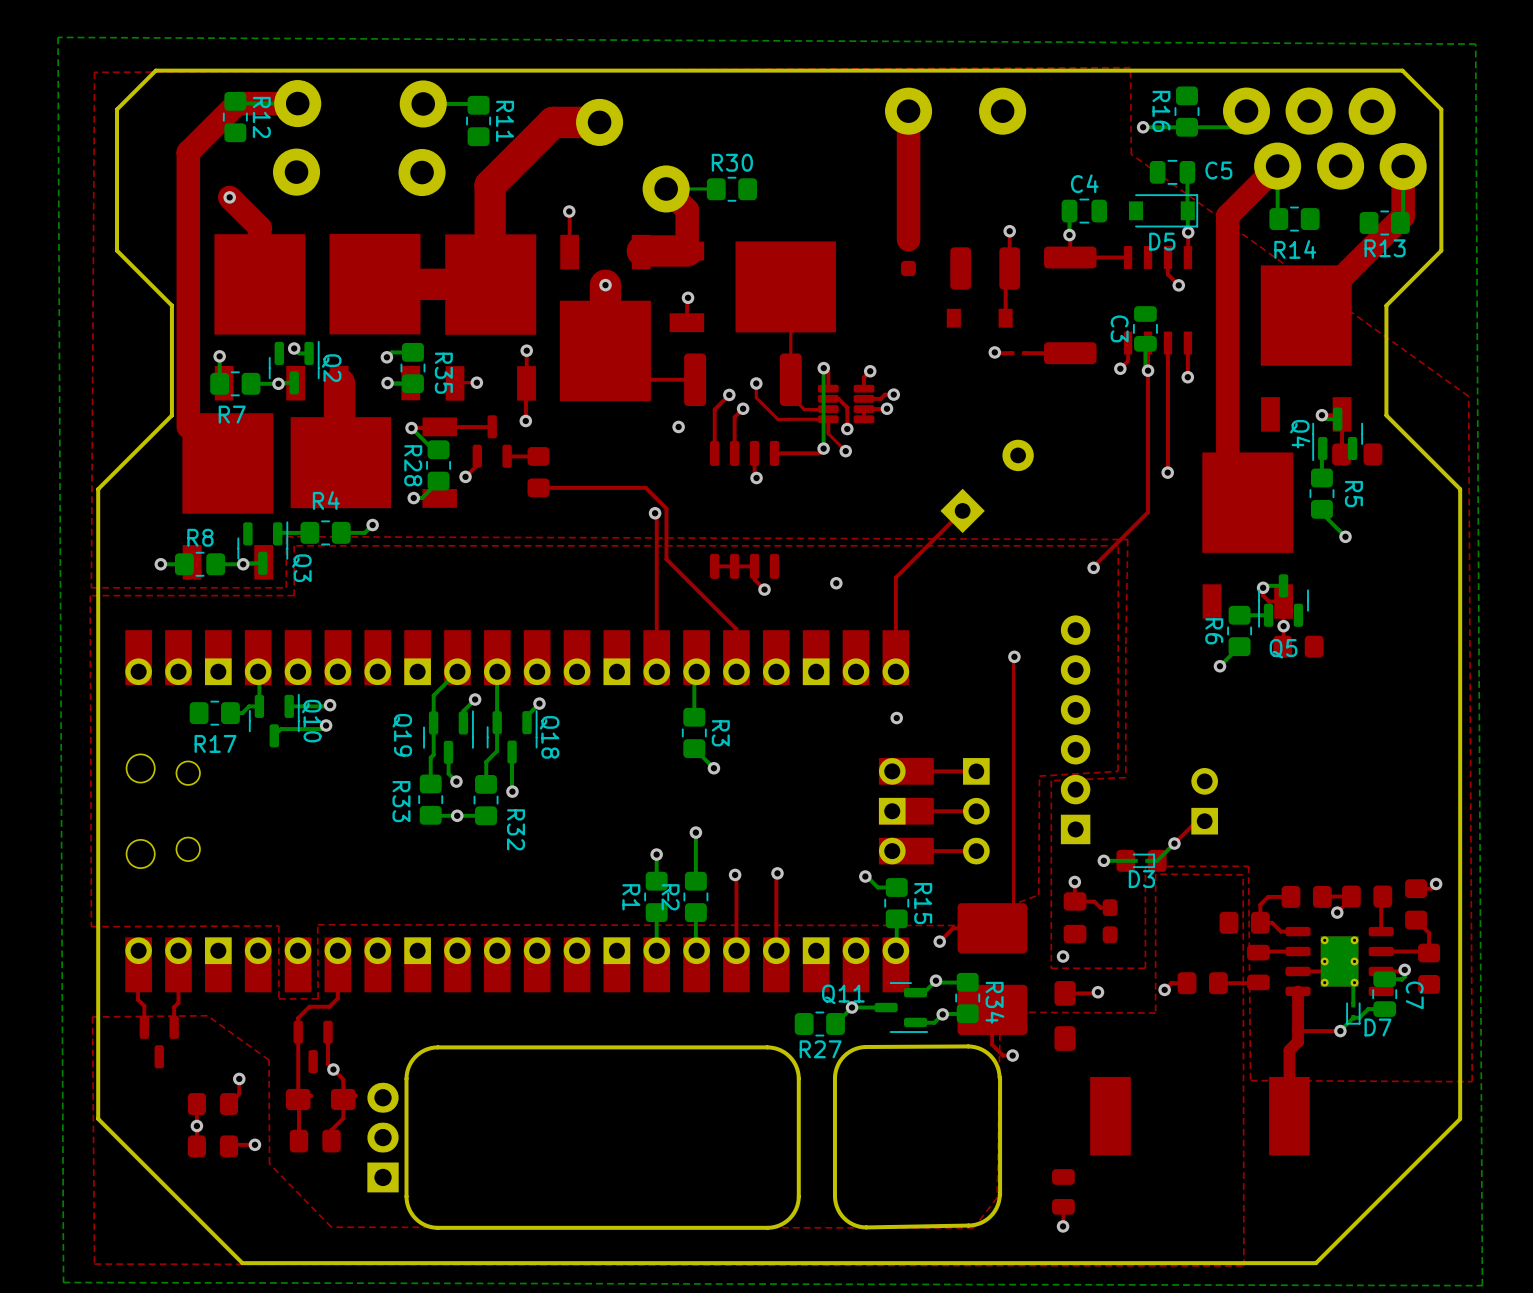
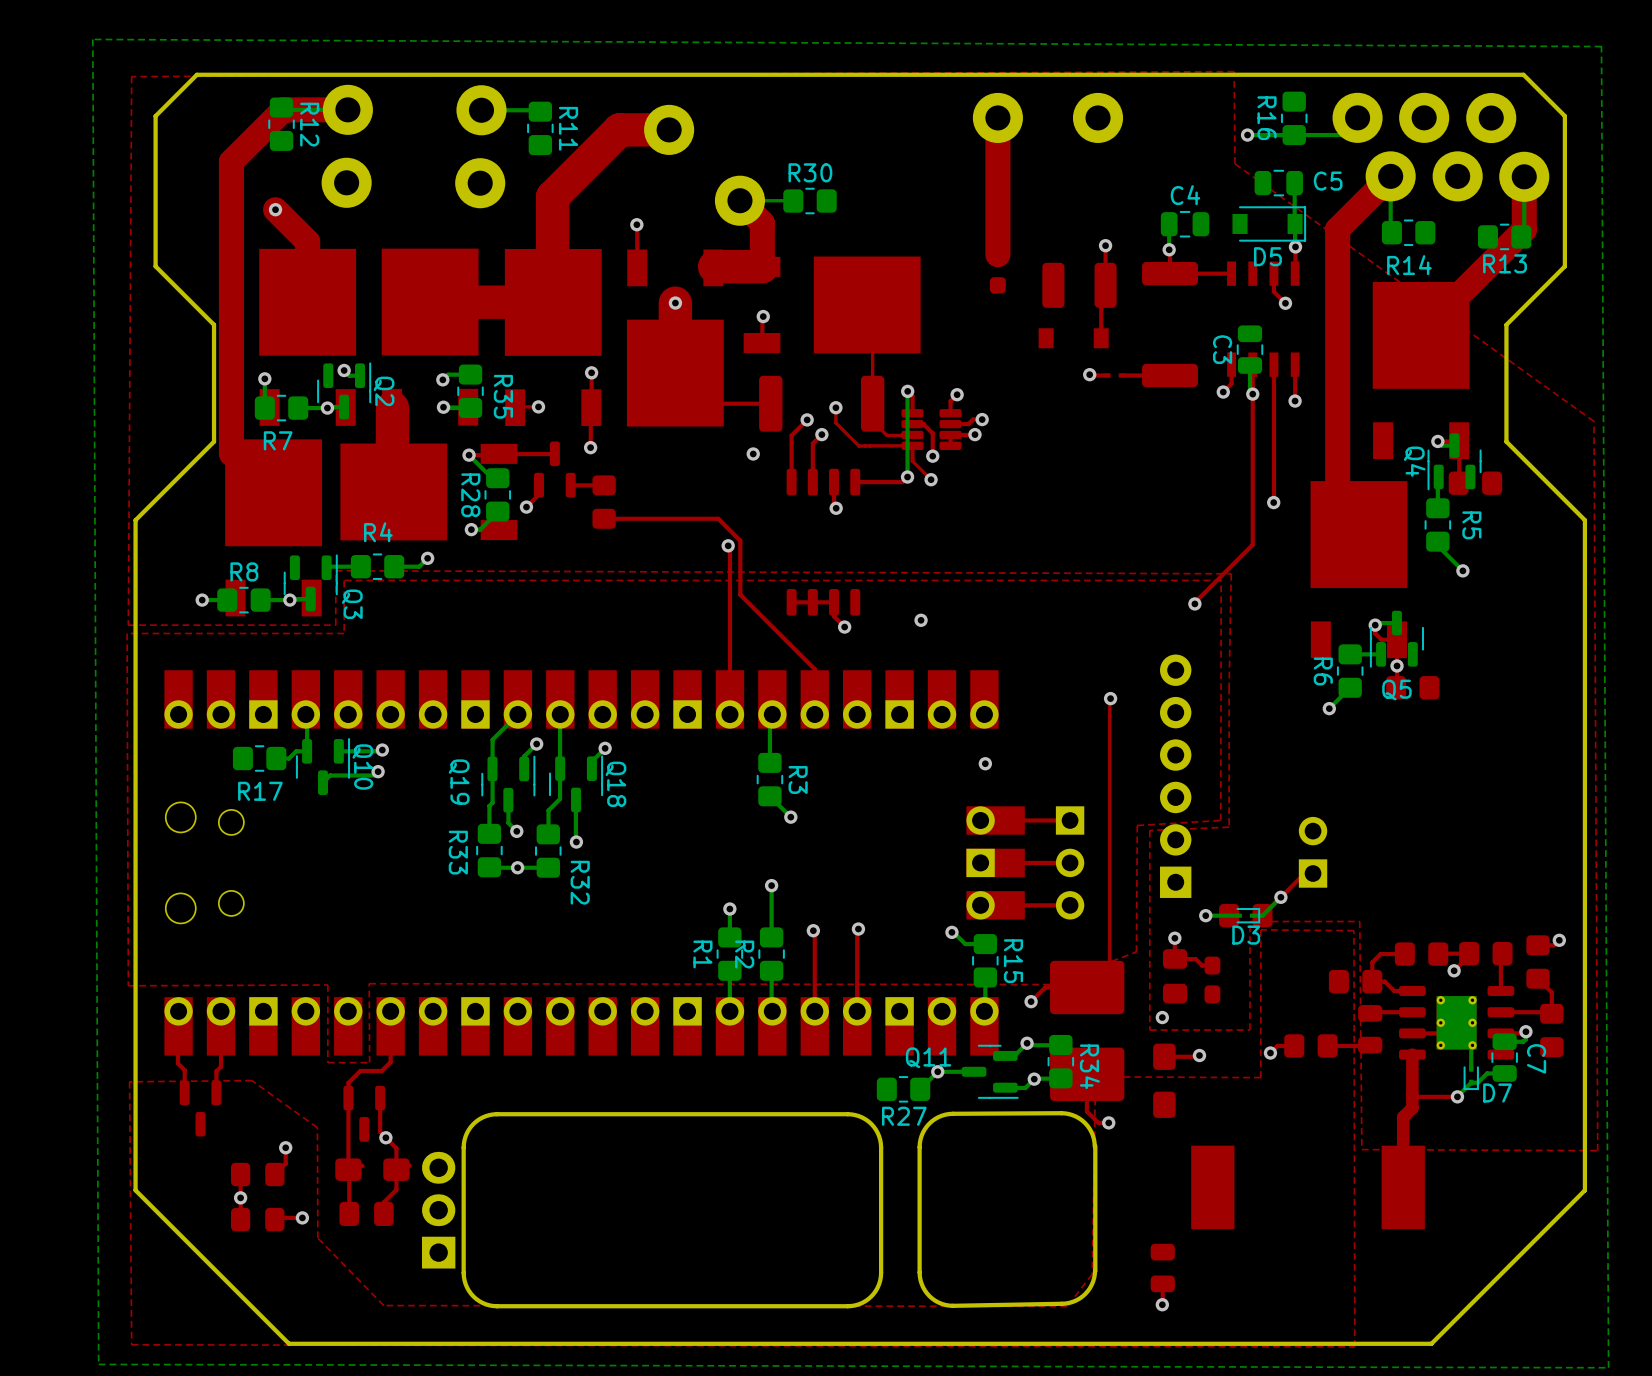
part: (987, 486) -> none
top track: (962, 510) (895, 577) (895, 671) -> none

